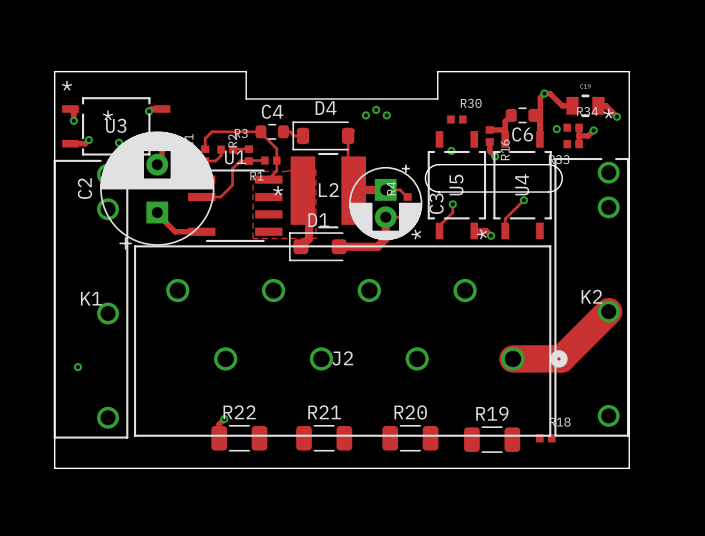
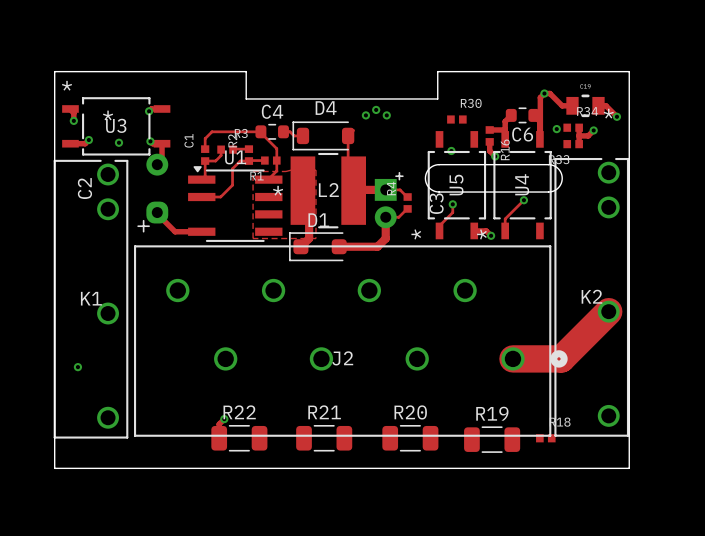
C2 footprint: [100, 131, 215, 250] -> [137, 153, 169, 233]
C3 footprint: [349, 164, 423, 241] -> [374, 171, 404, 229]

